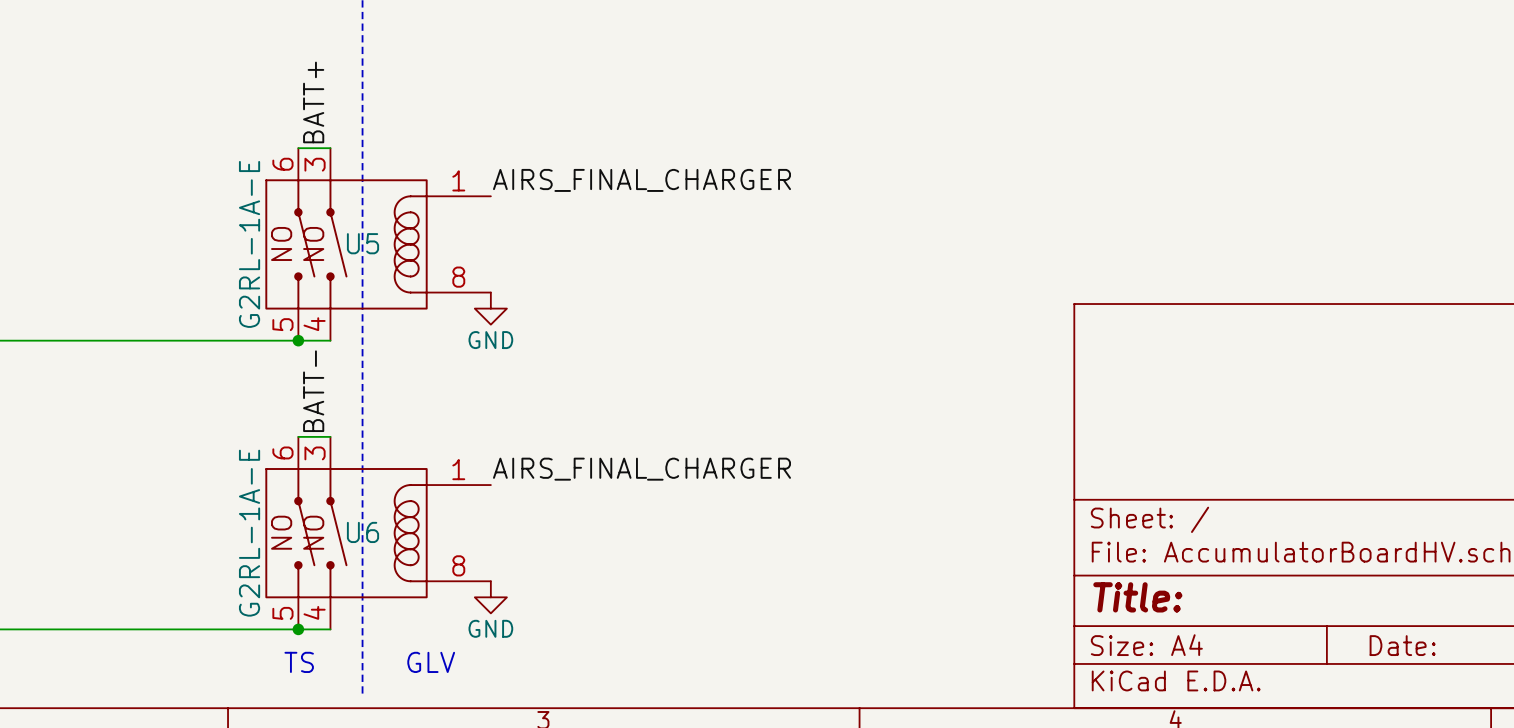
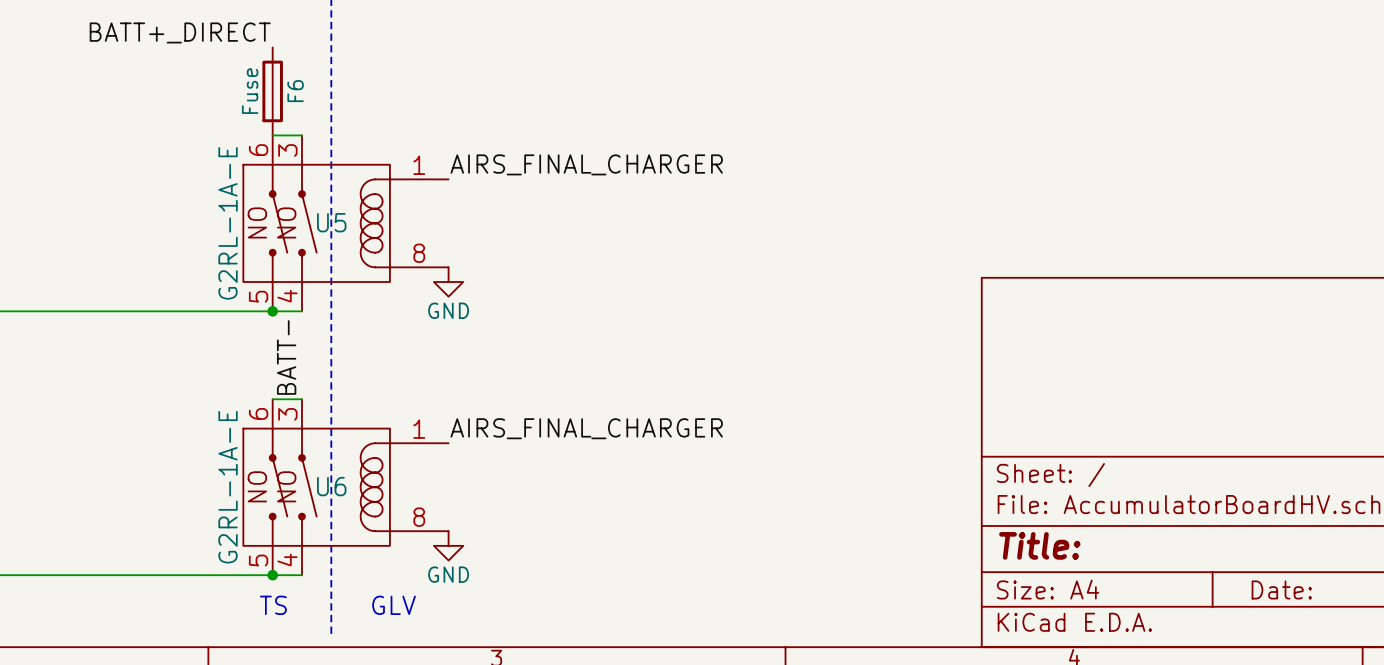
label: none -> BATT+_DIRECT (180, 32)
F6: none -> Fuse (272, 91)
label: BATT+ (313, 102) -> none

